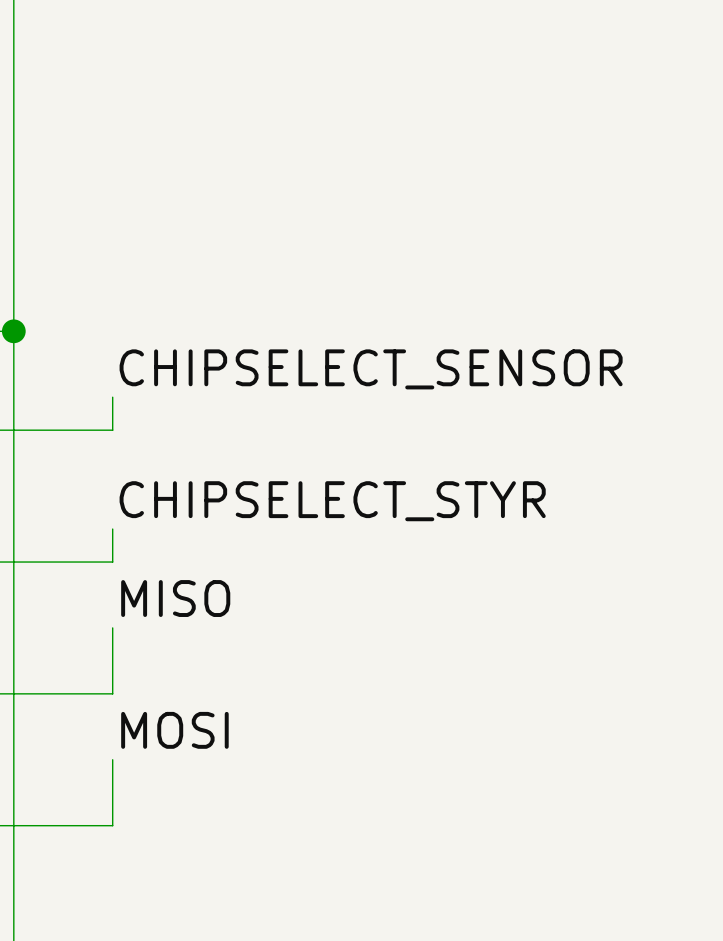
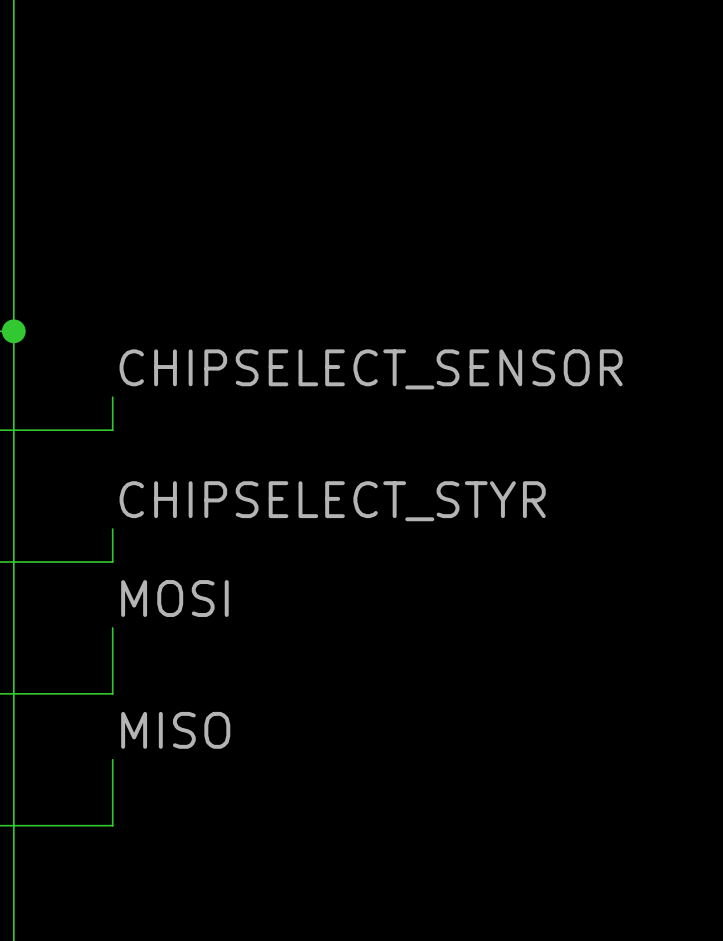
label: MISO (175, 598) -> MOSI (174, 598)
label: MOSI (174, 730) -> MISO (175, 730)

